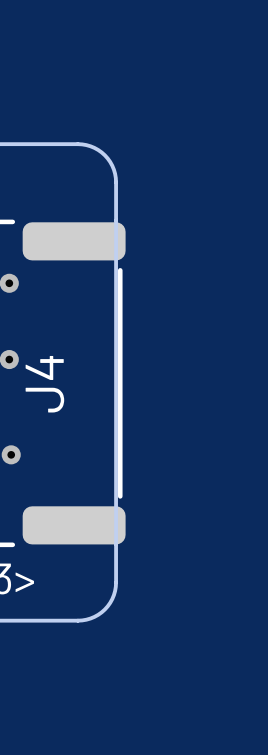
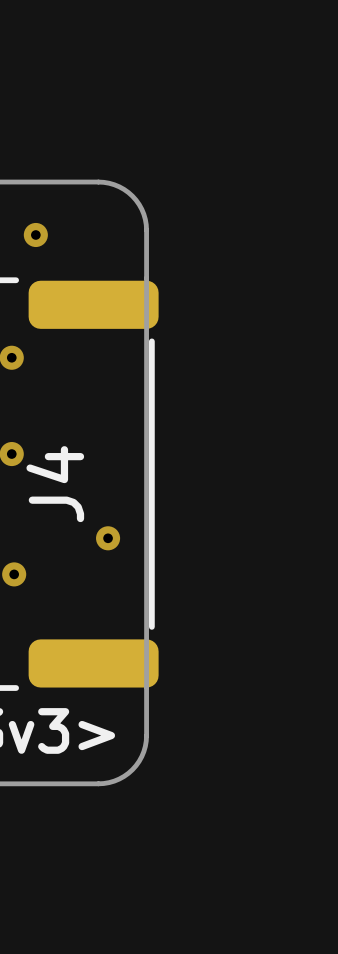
via: none -> (35, 234)
via: none -> (108, 538)

